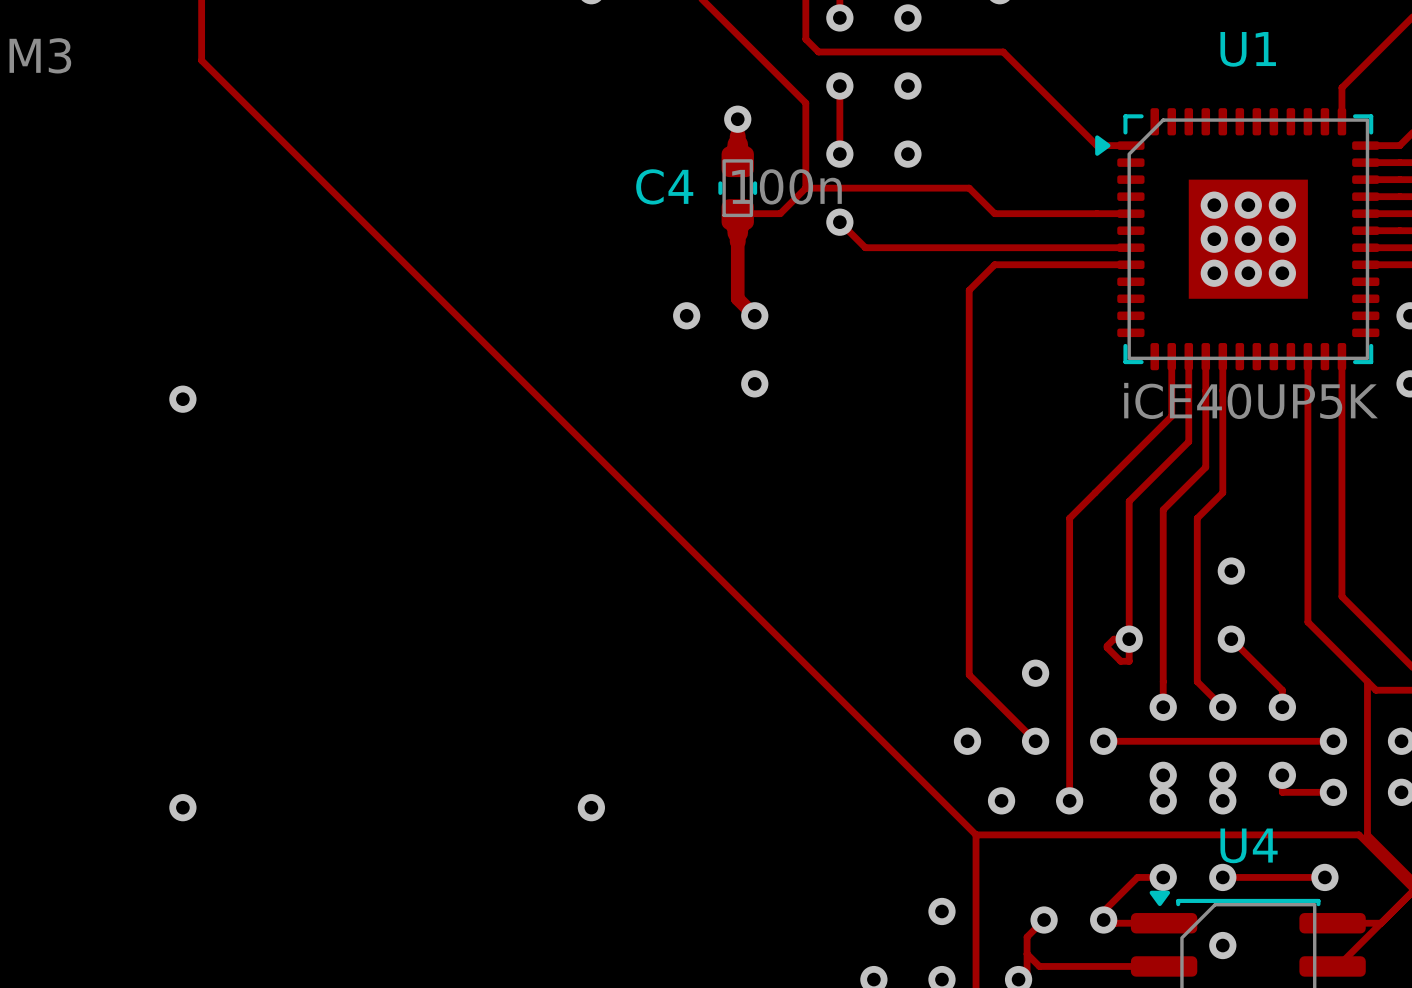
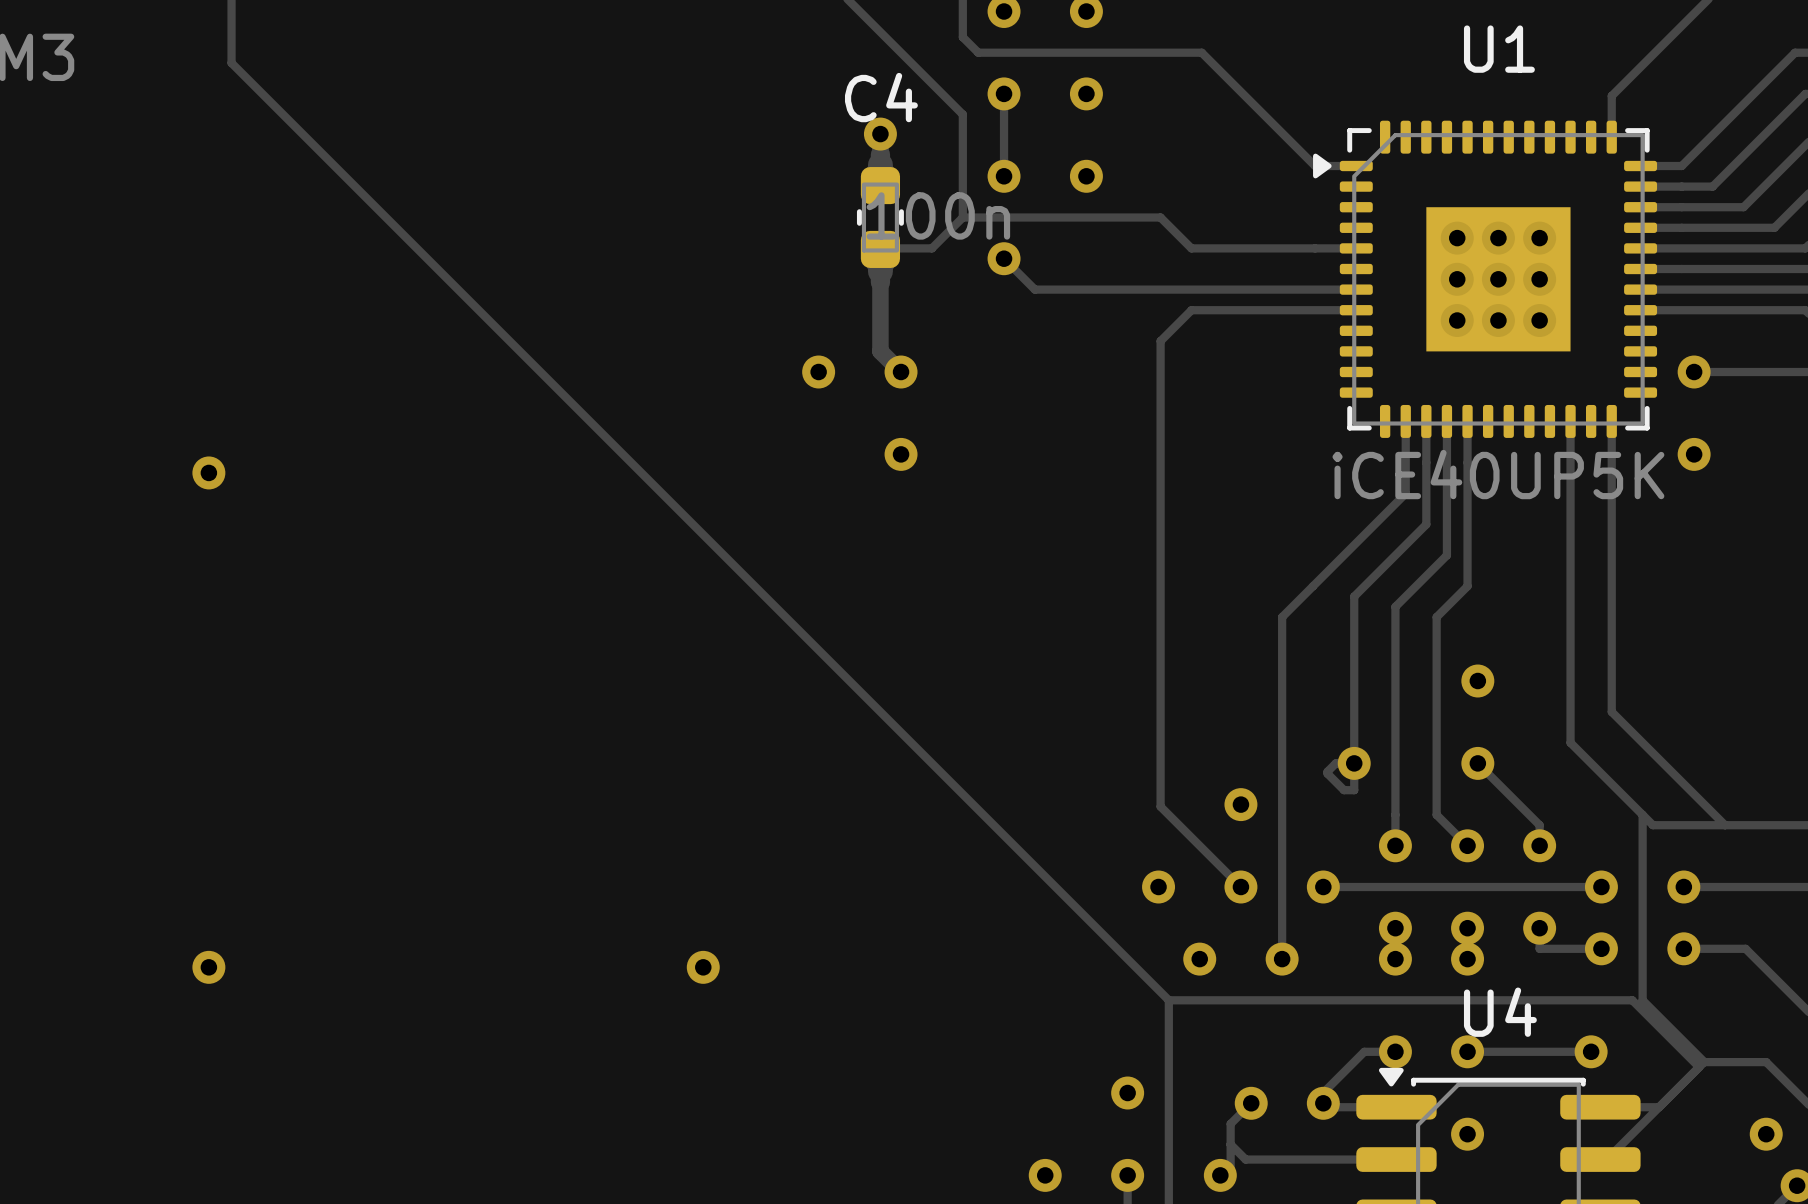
C4 name position: C4 (664, 186) -> C4 (881, 97)

